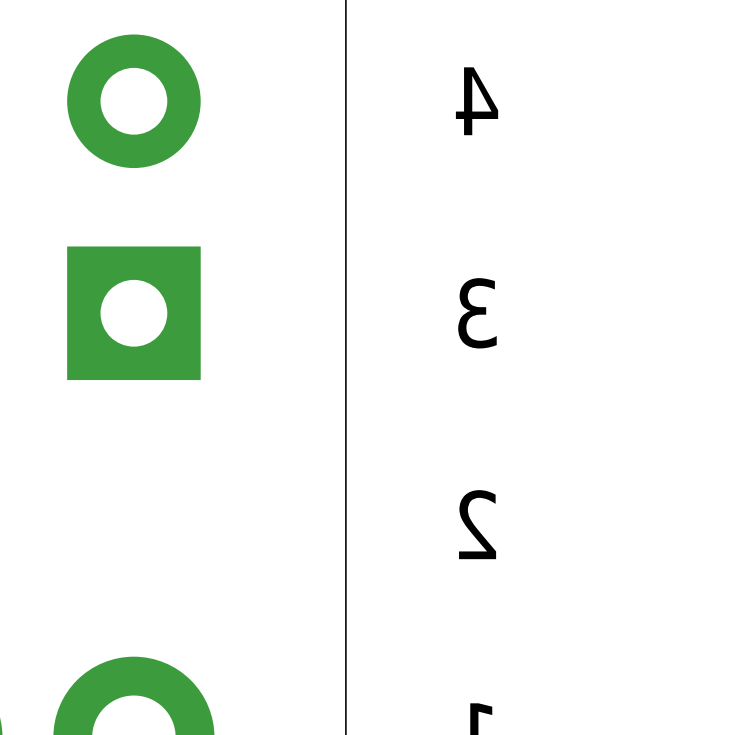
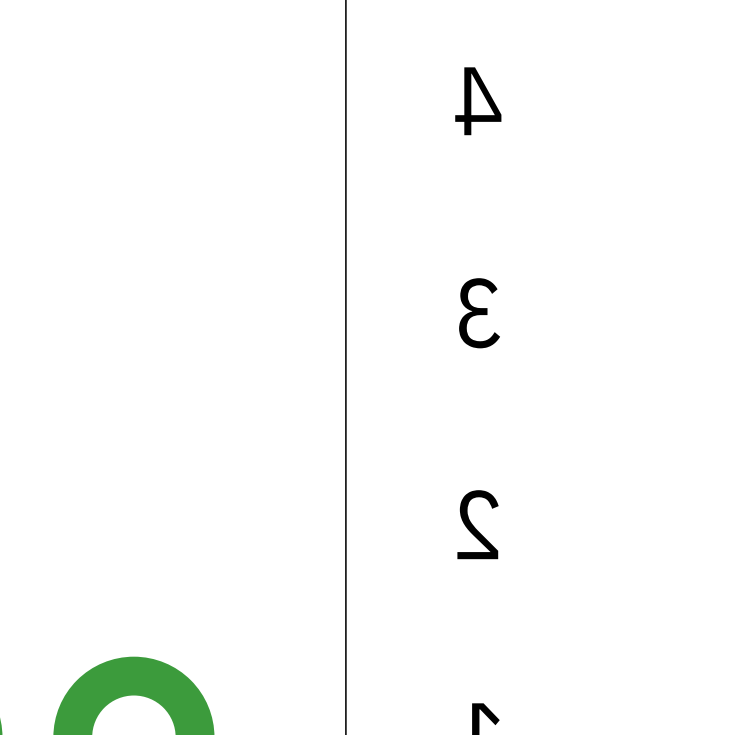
part: (133, 207) -> none

